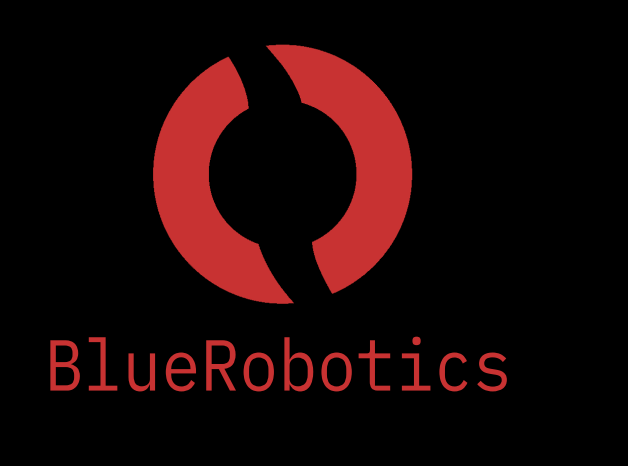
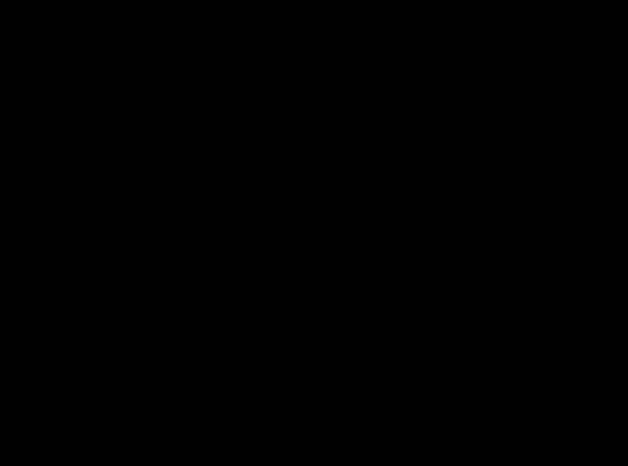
part: (282, 174) -> none

